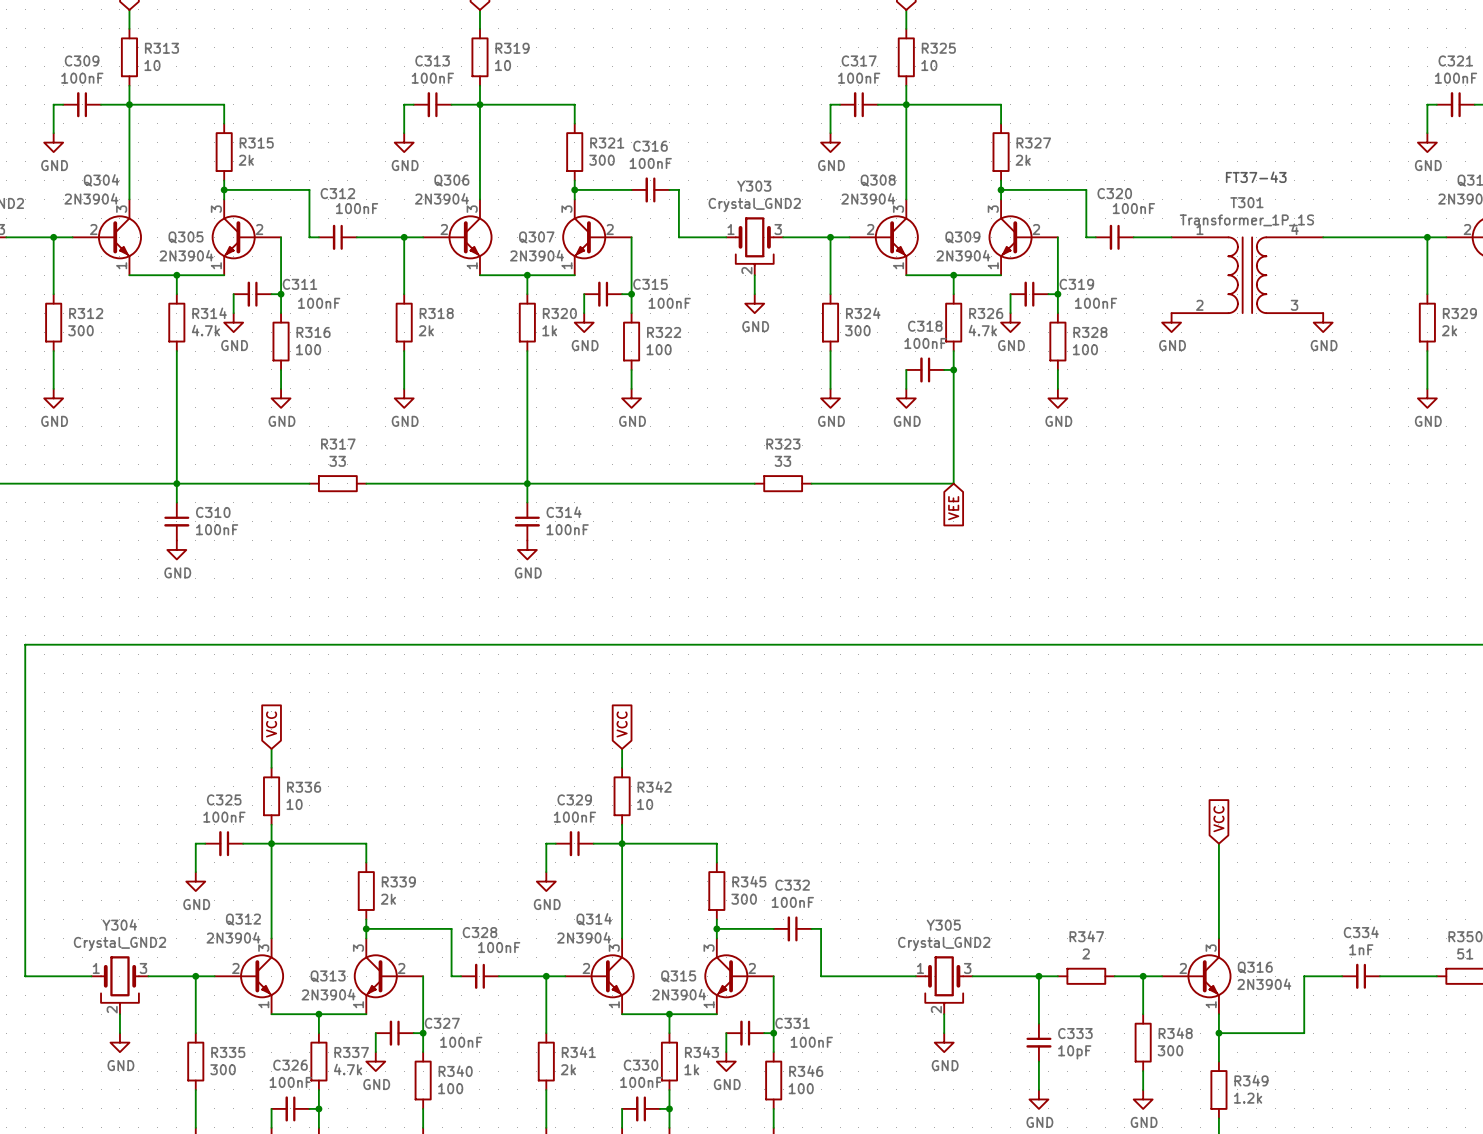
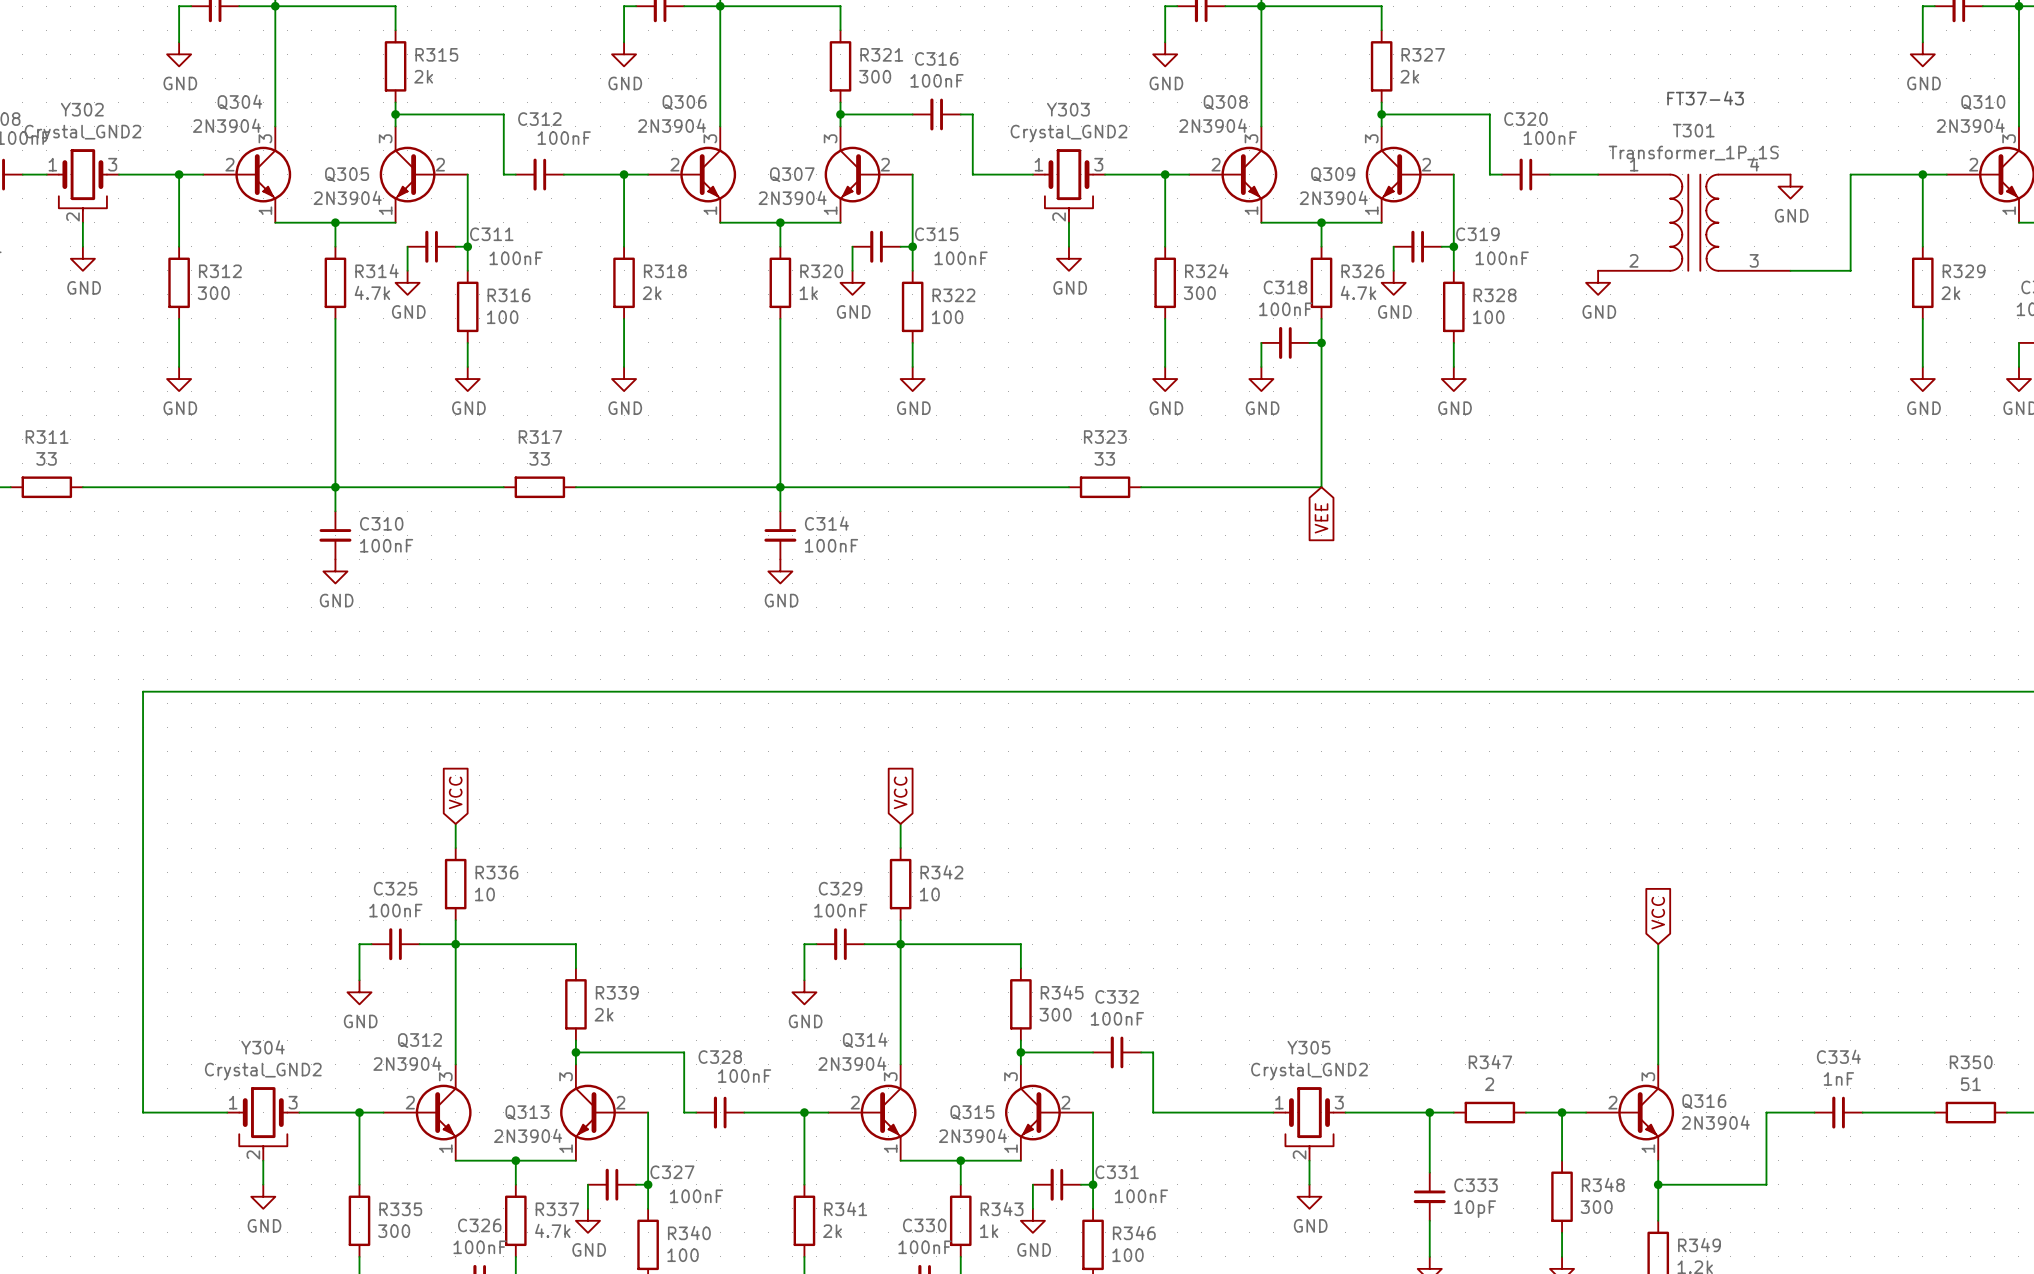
wire: (1323, 237) (1370, 237) -> (1790, 270) (1850, 270) (1850, 174)
power symbol position: GND (1323, 322) -> GND (1790, 186)

